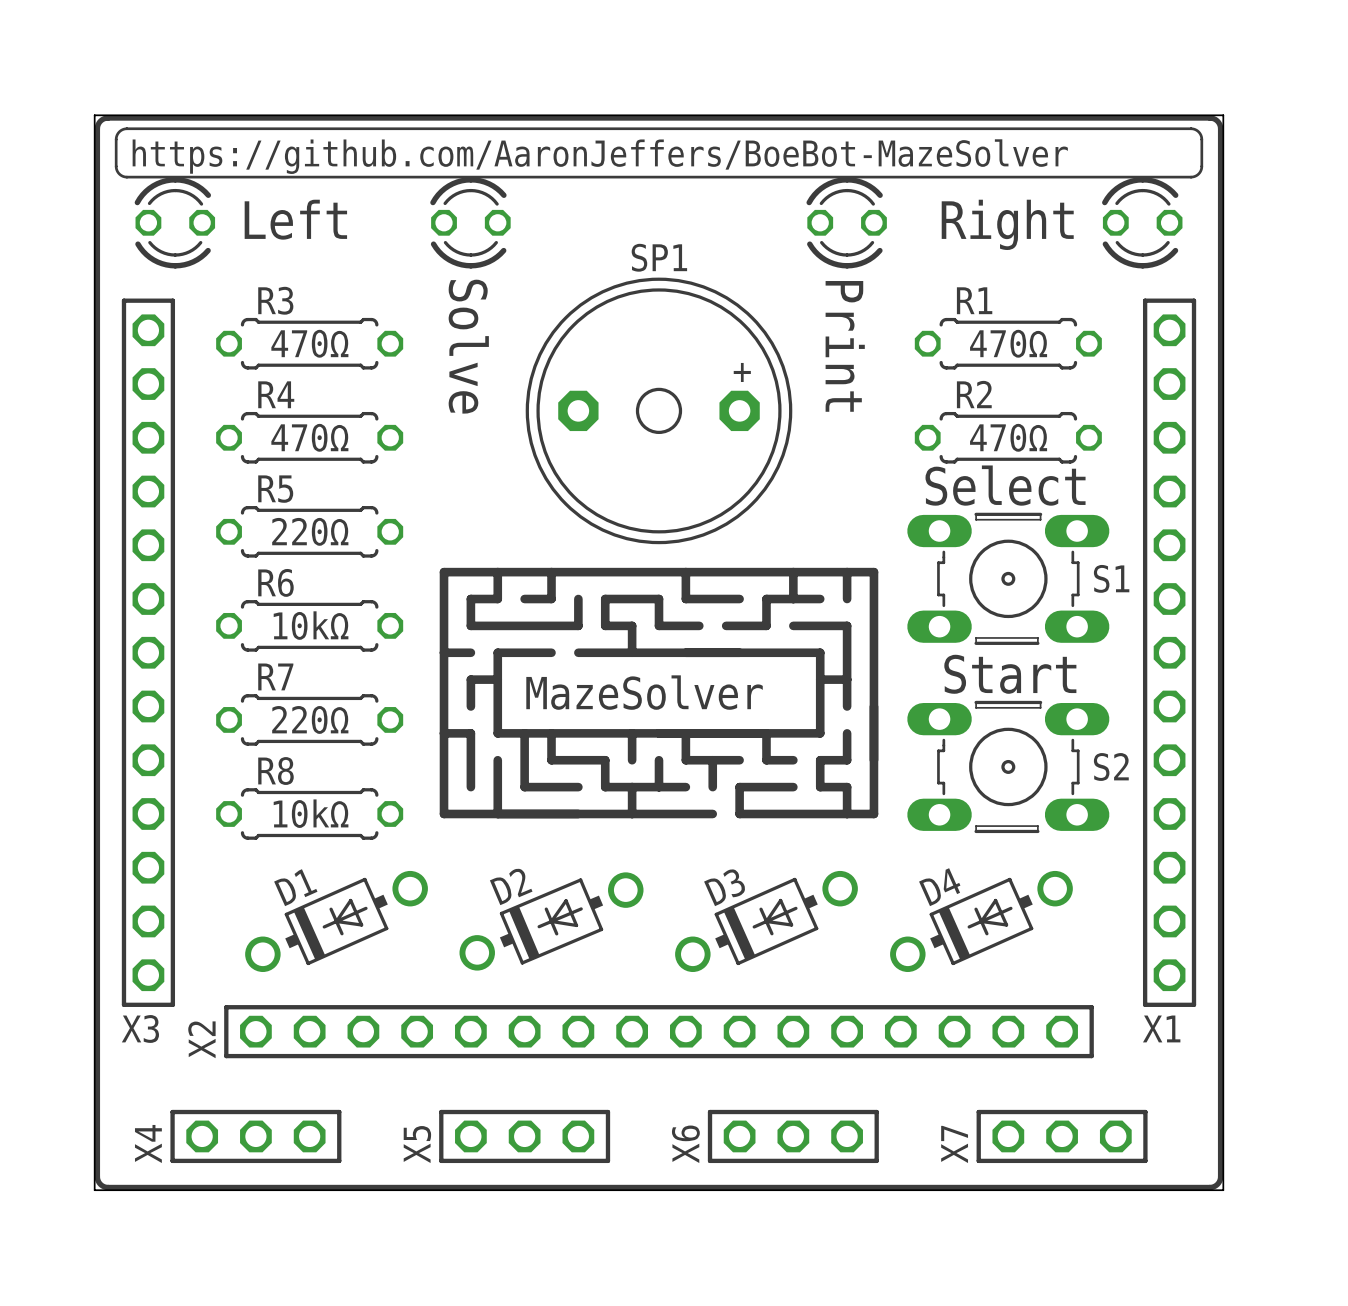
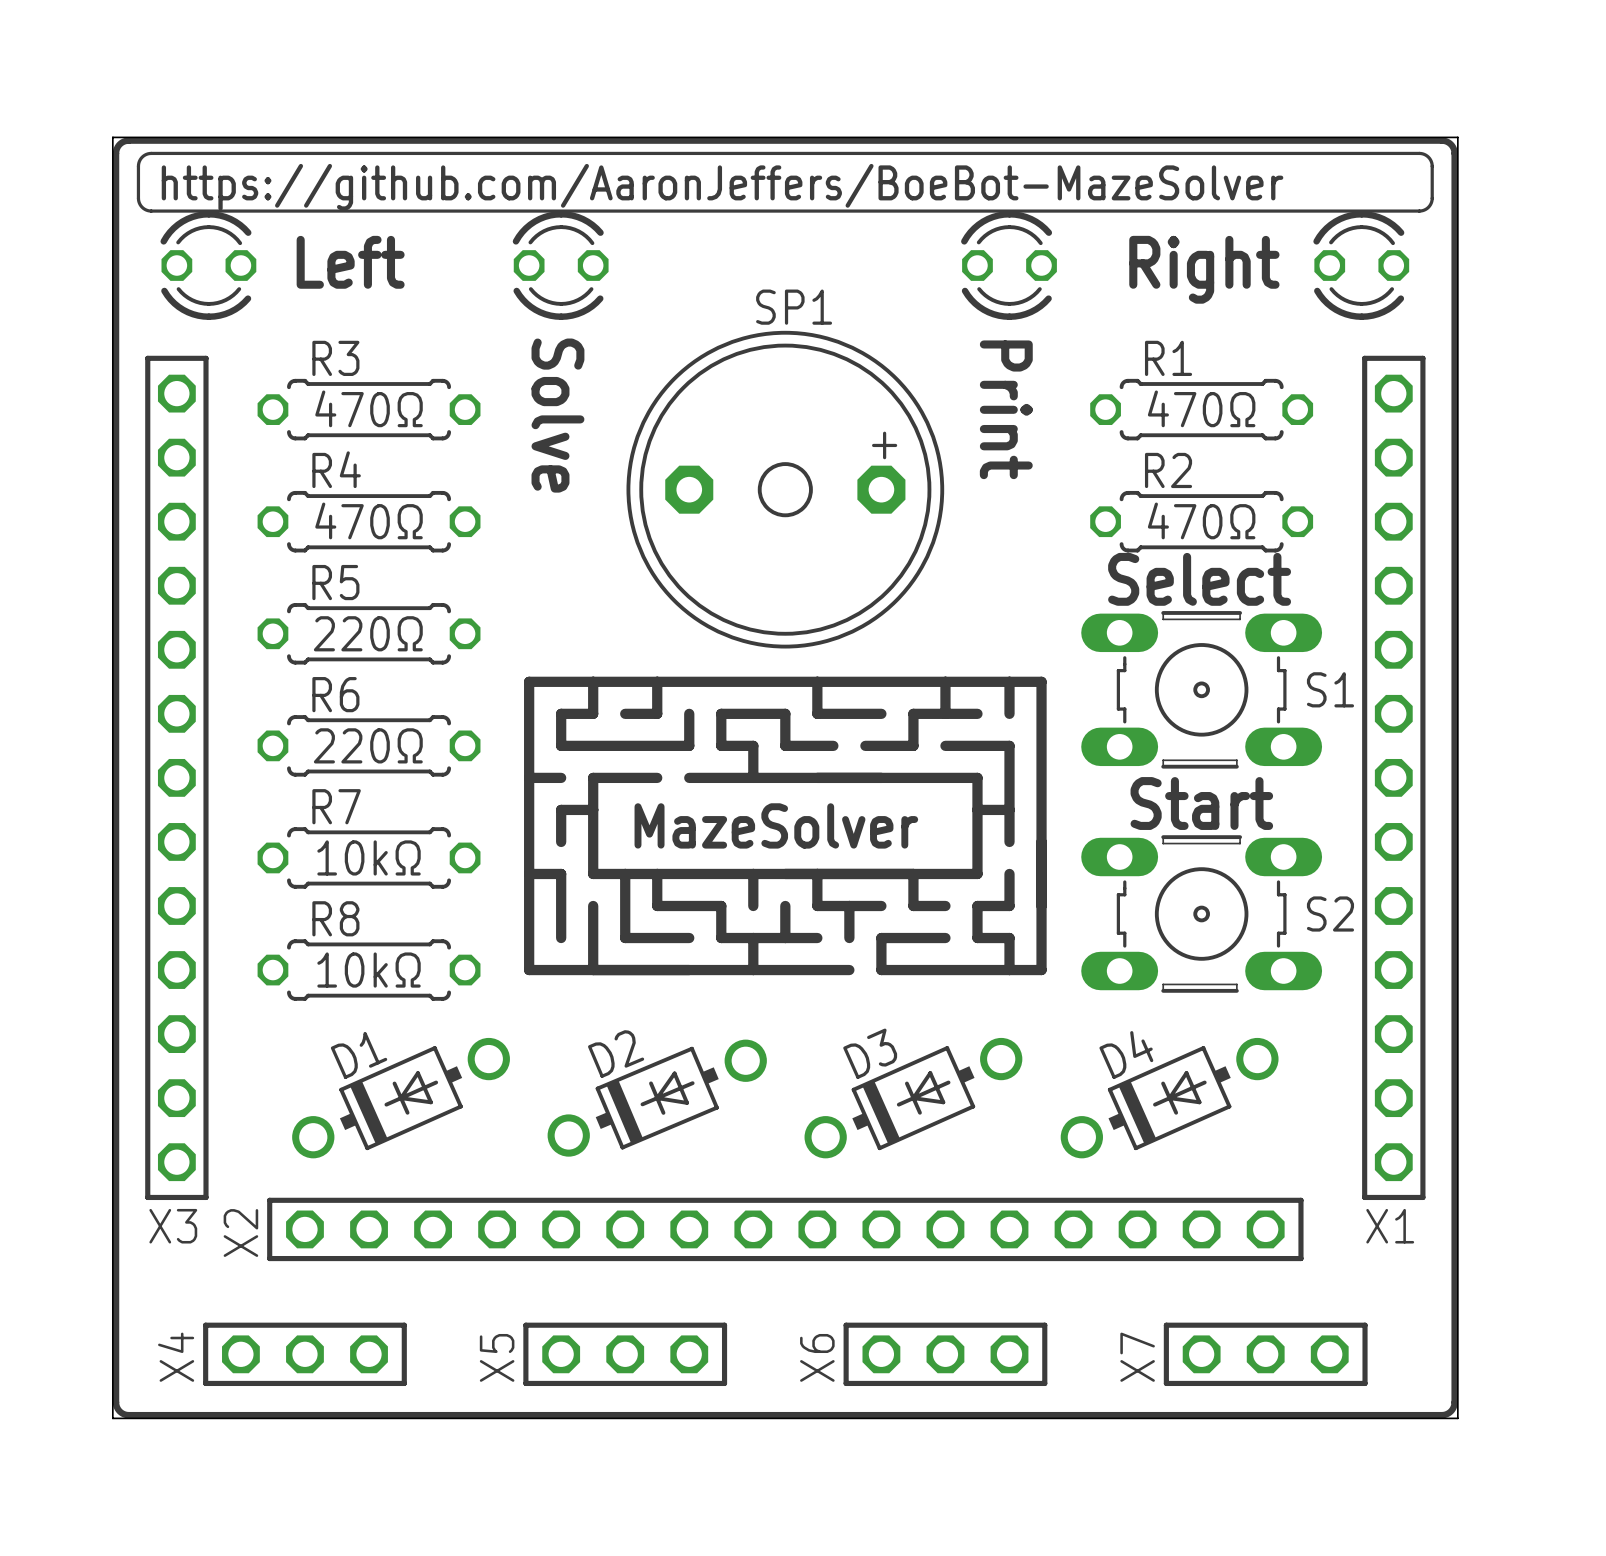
text: 10kΩ (311, 625) -> 220Ω (368, 745)
text: 220Ω (310, 719) -> 10kΩ (369, 857)

